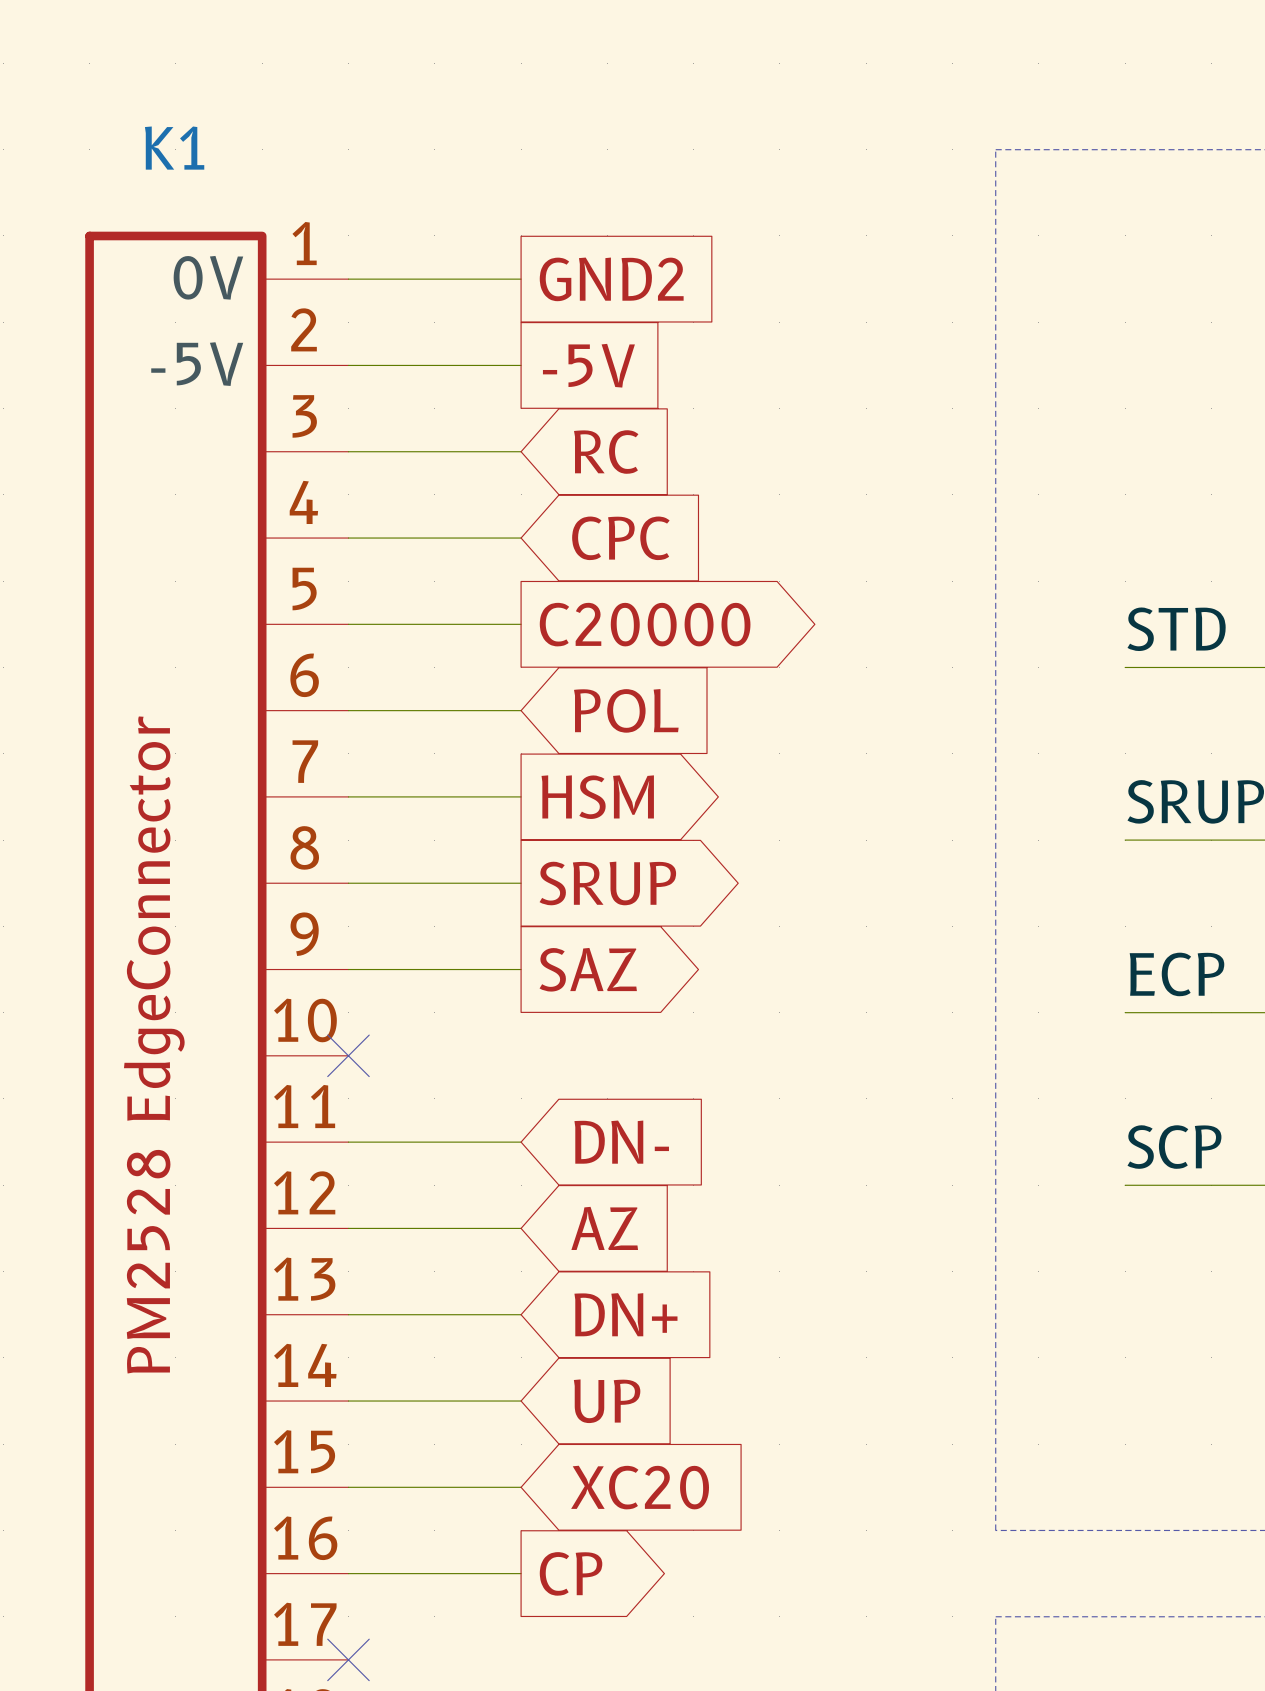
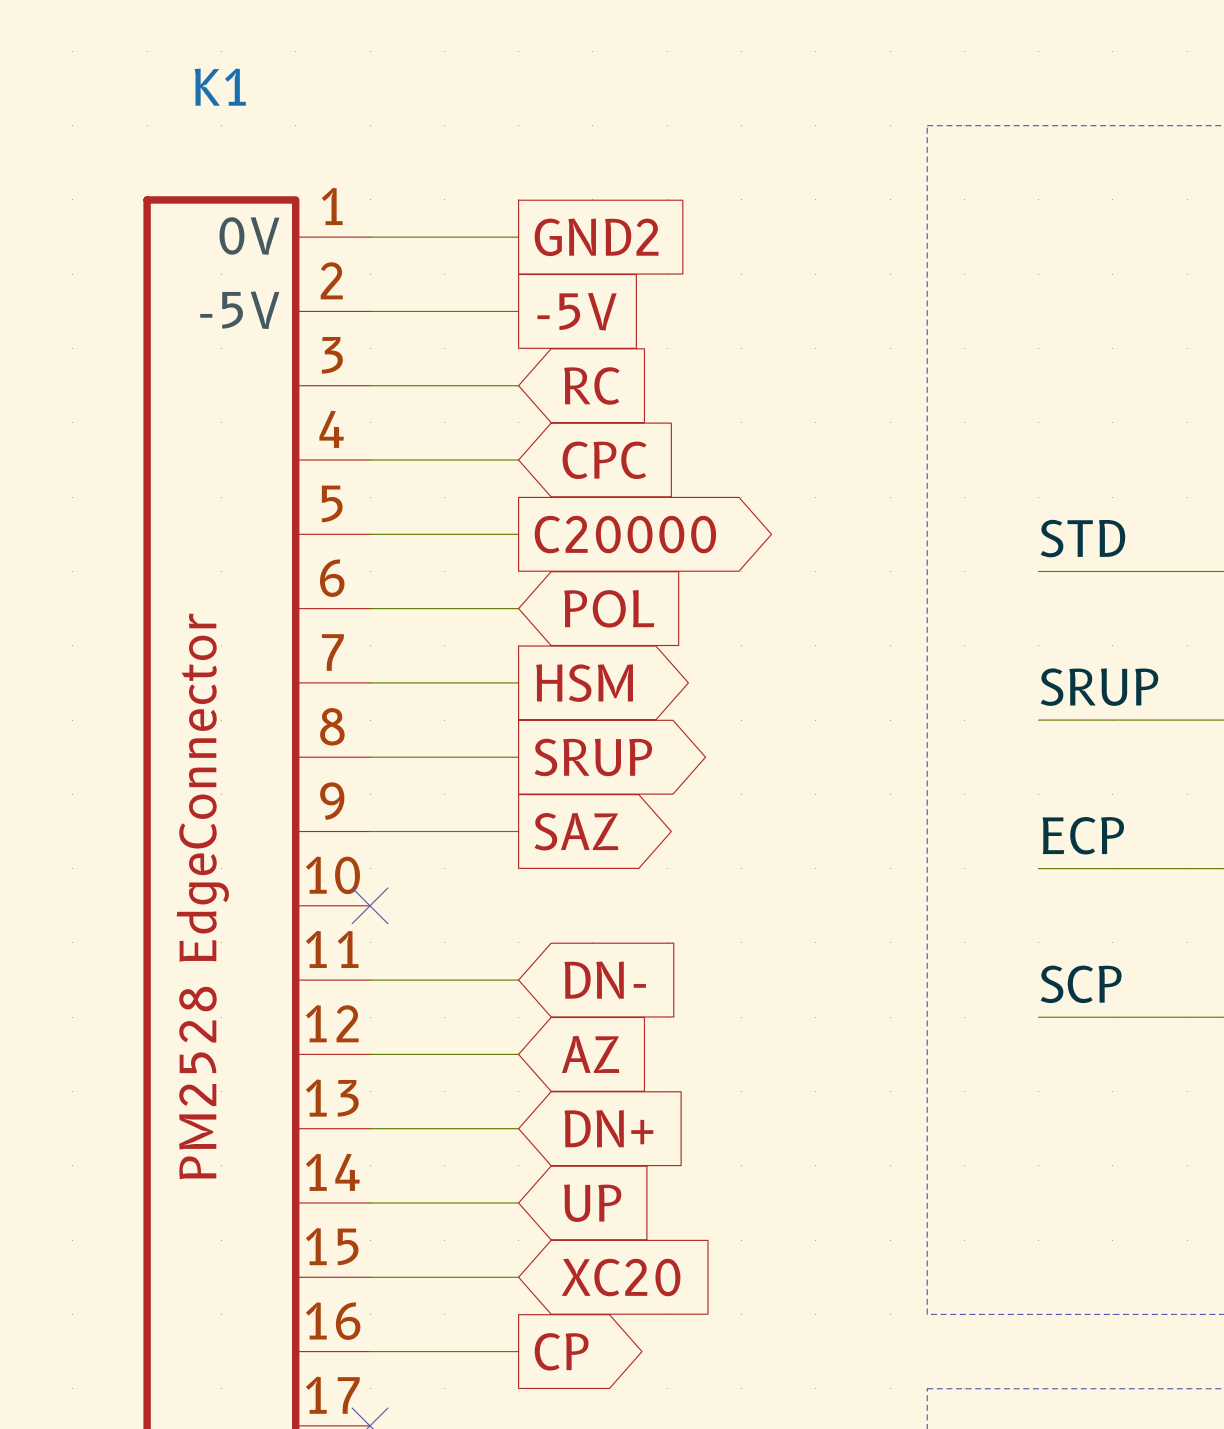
K1 name position: K1 (174, 148) -> K1 (220, 87)

